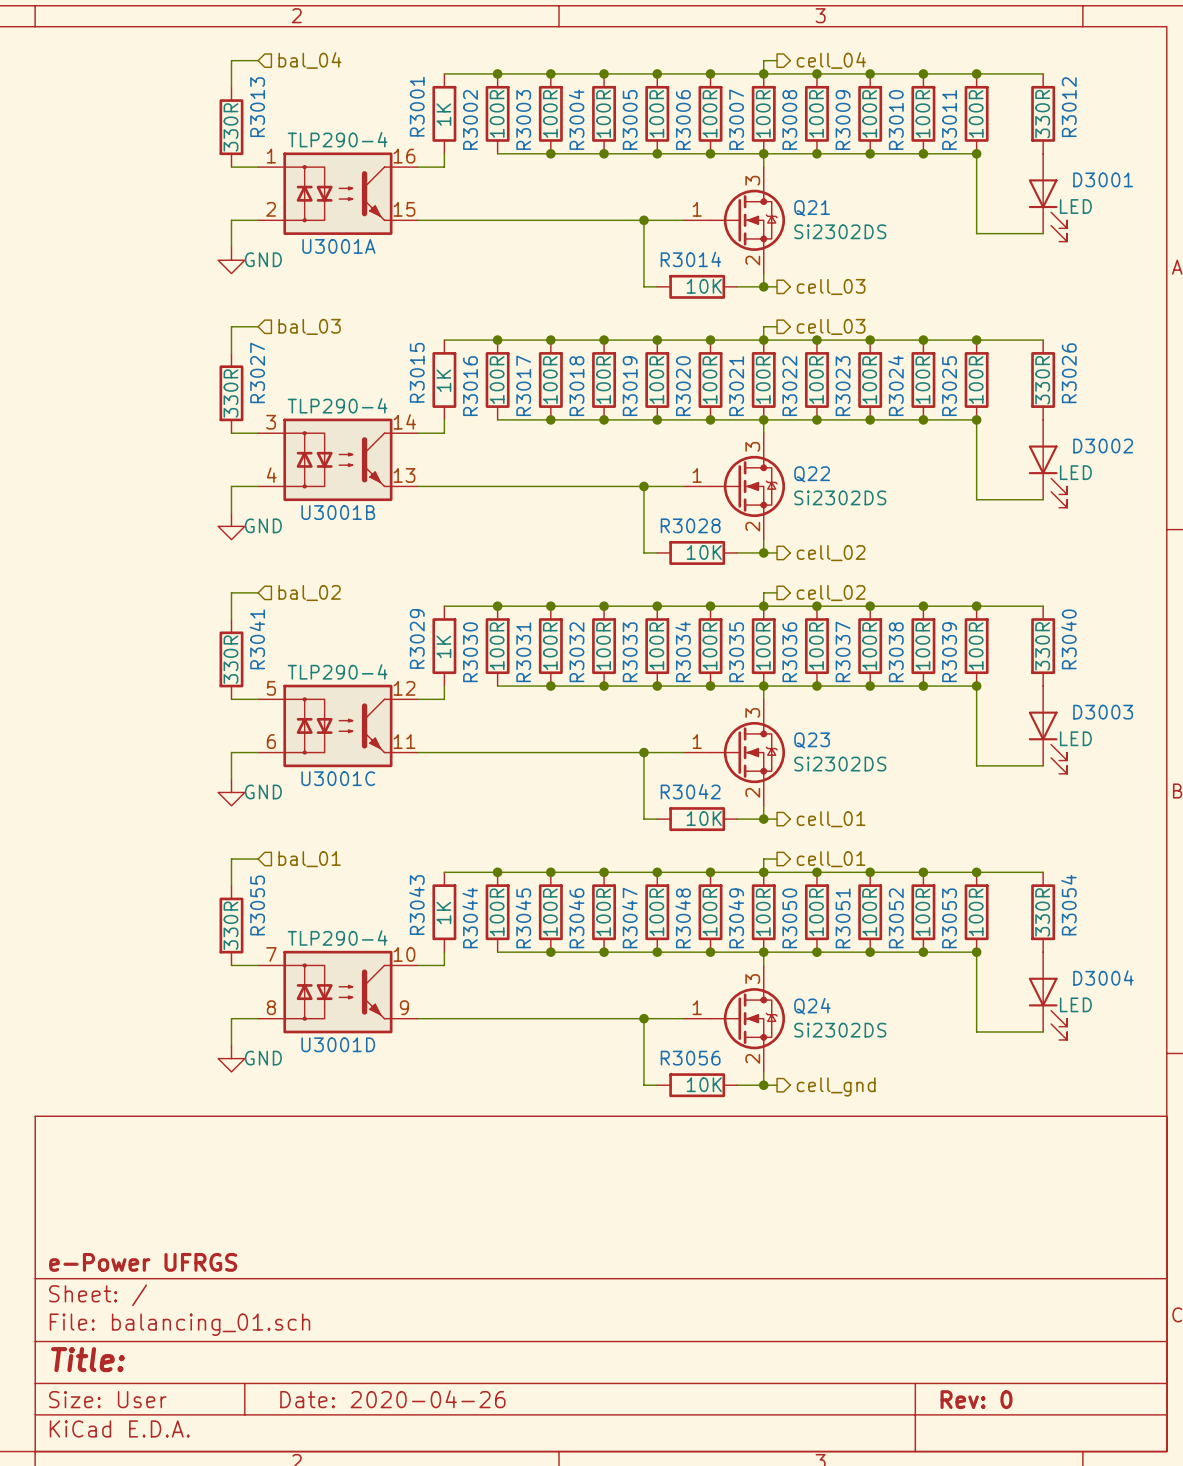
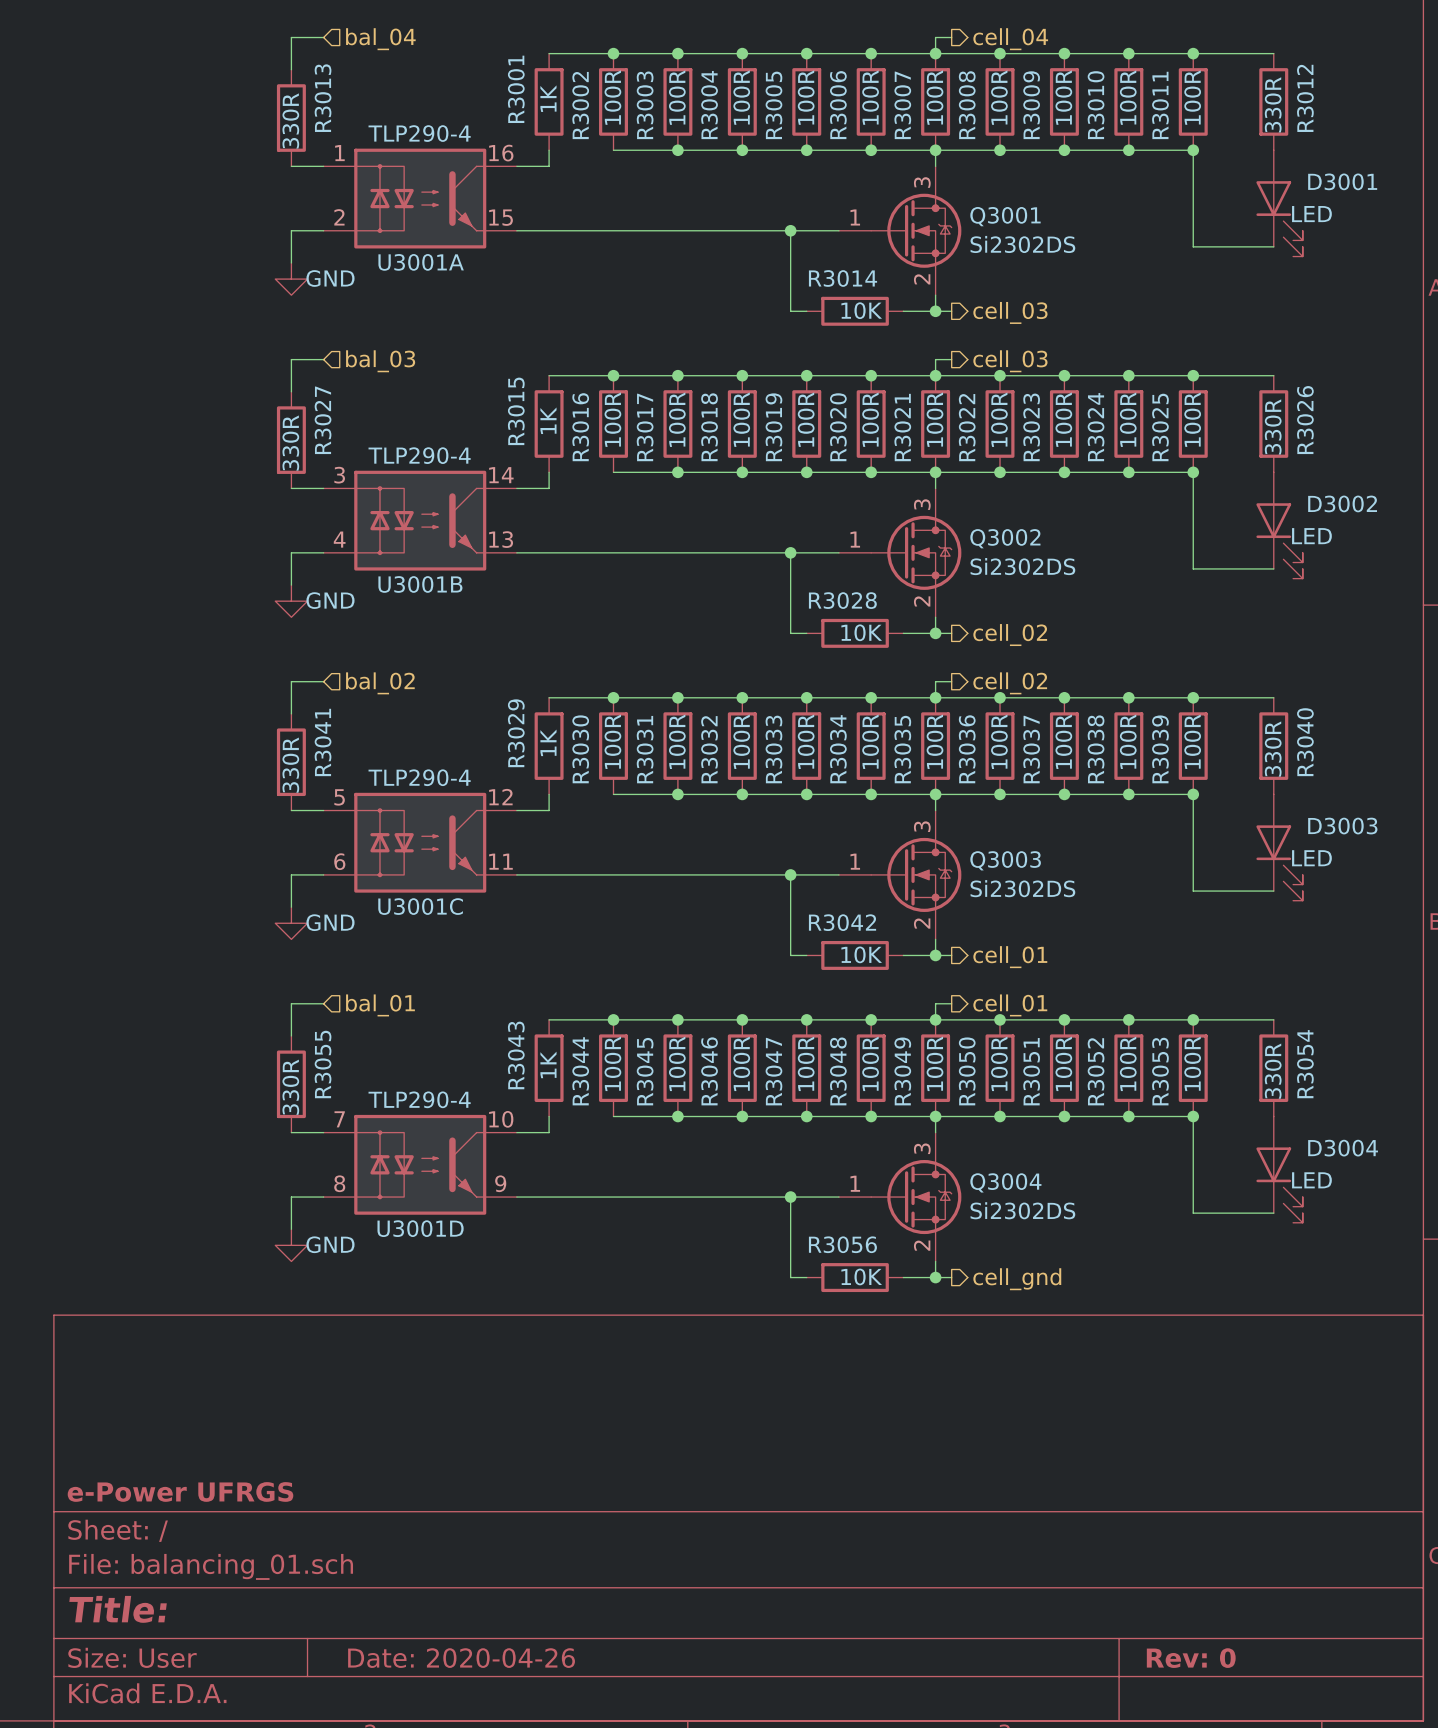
Q21 name: Q21 (812, 208) -> Q3001 (1005, 216)
Q22 name: Q22 (812, 474) -> Q3002 (1005, 538)
Q23 name: Q23 (812, 740) -> Q3003 (1005, 860)
Q24 name: Q24 (812, 1006) -> Q3004 (1005, 1182)

